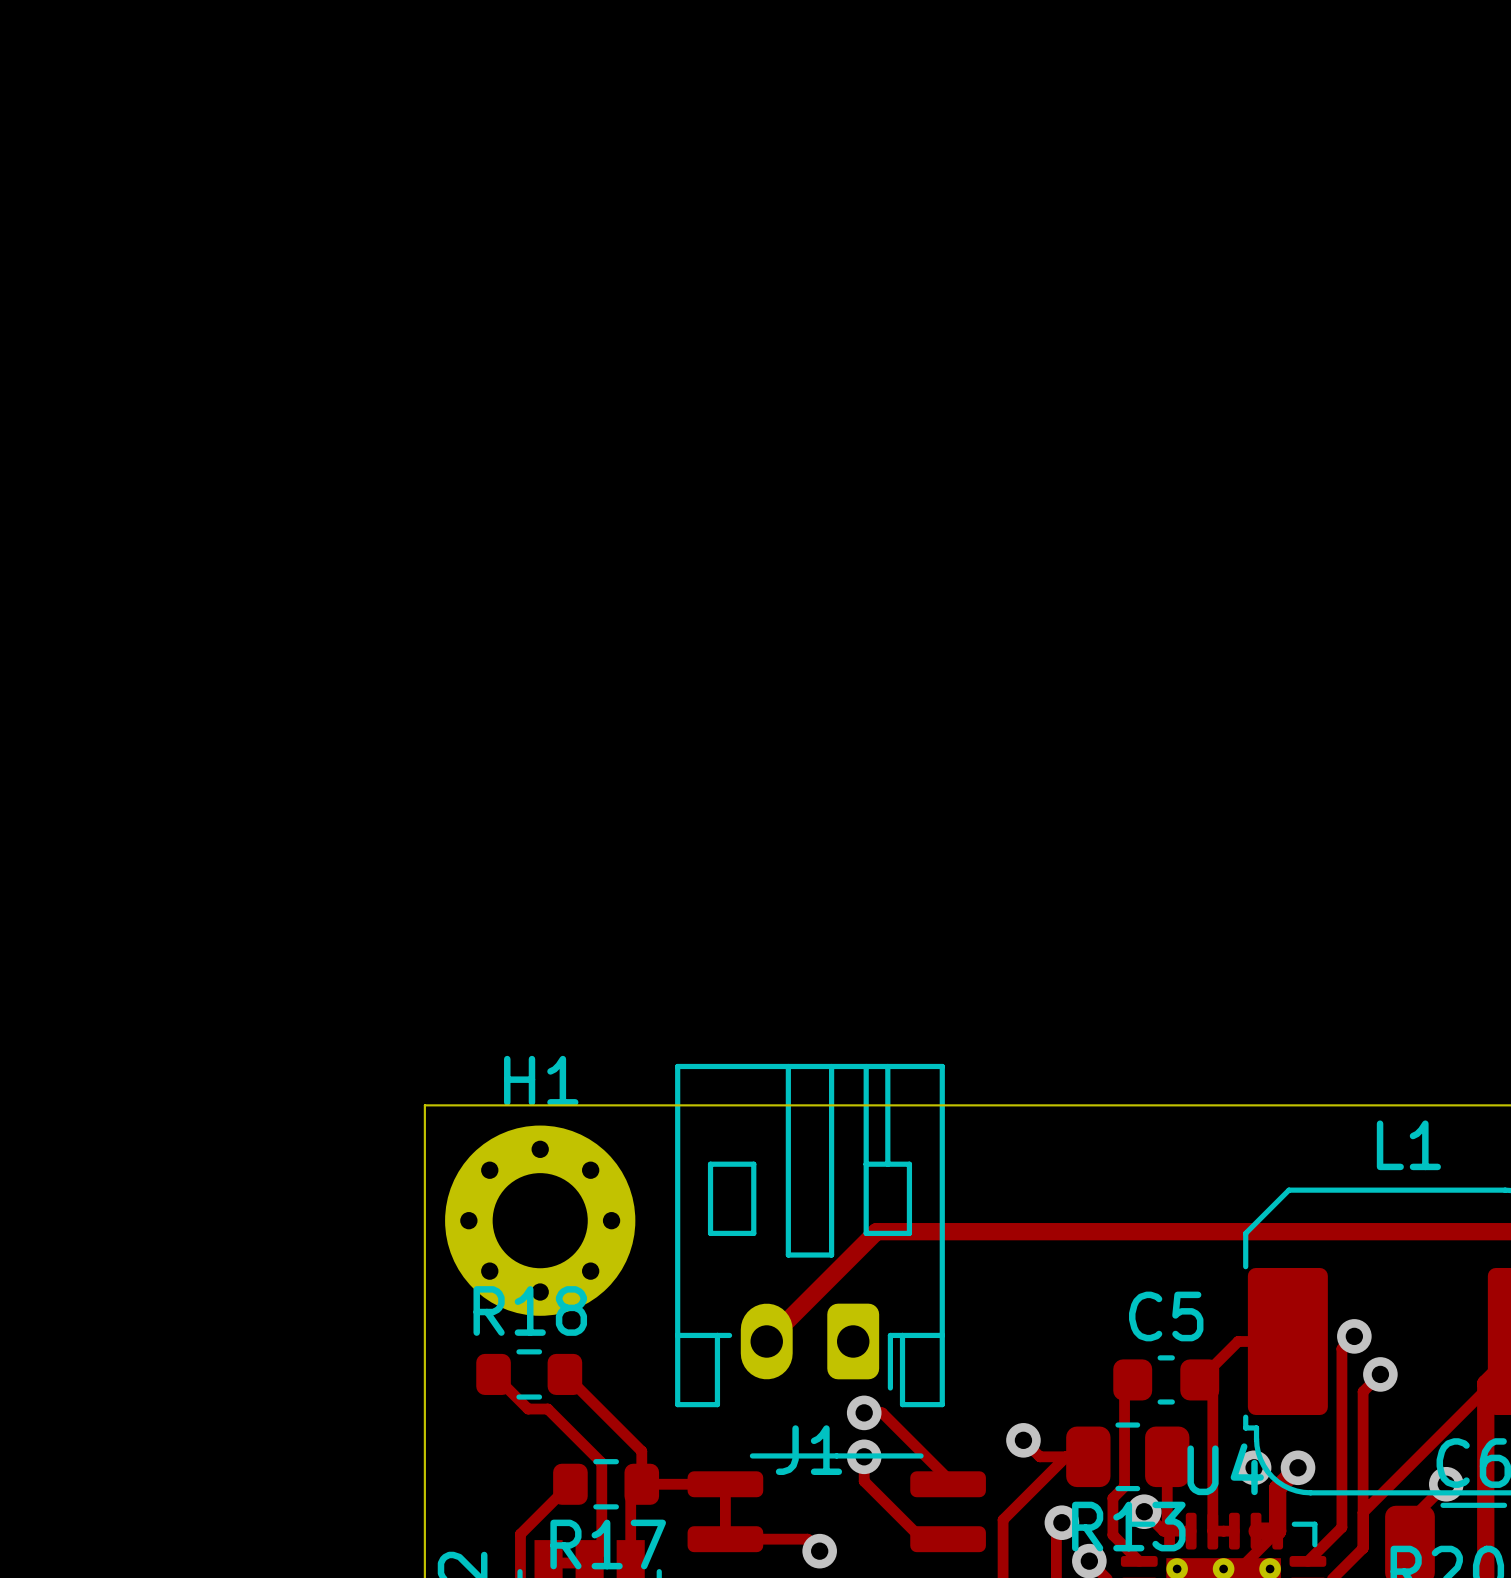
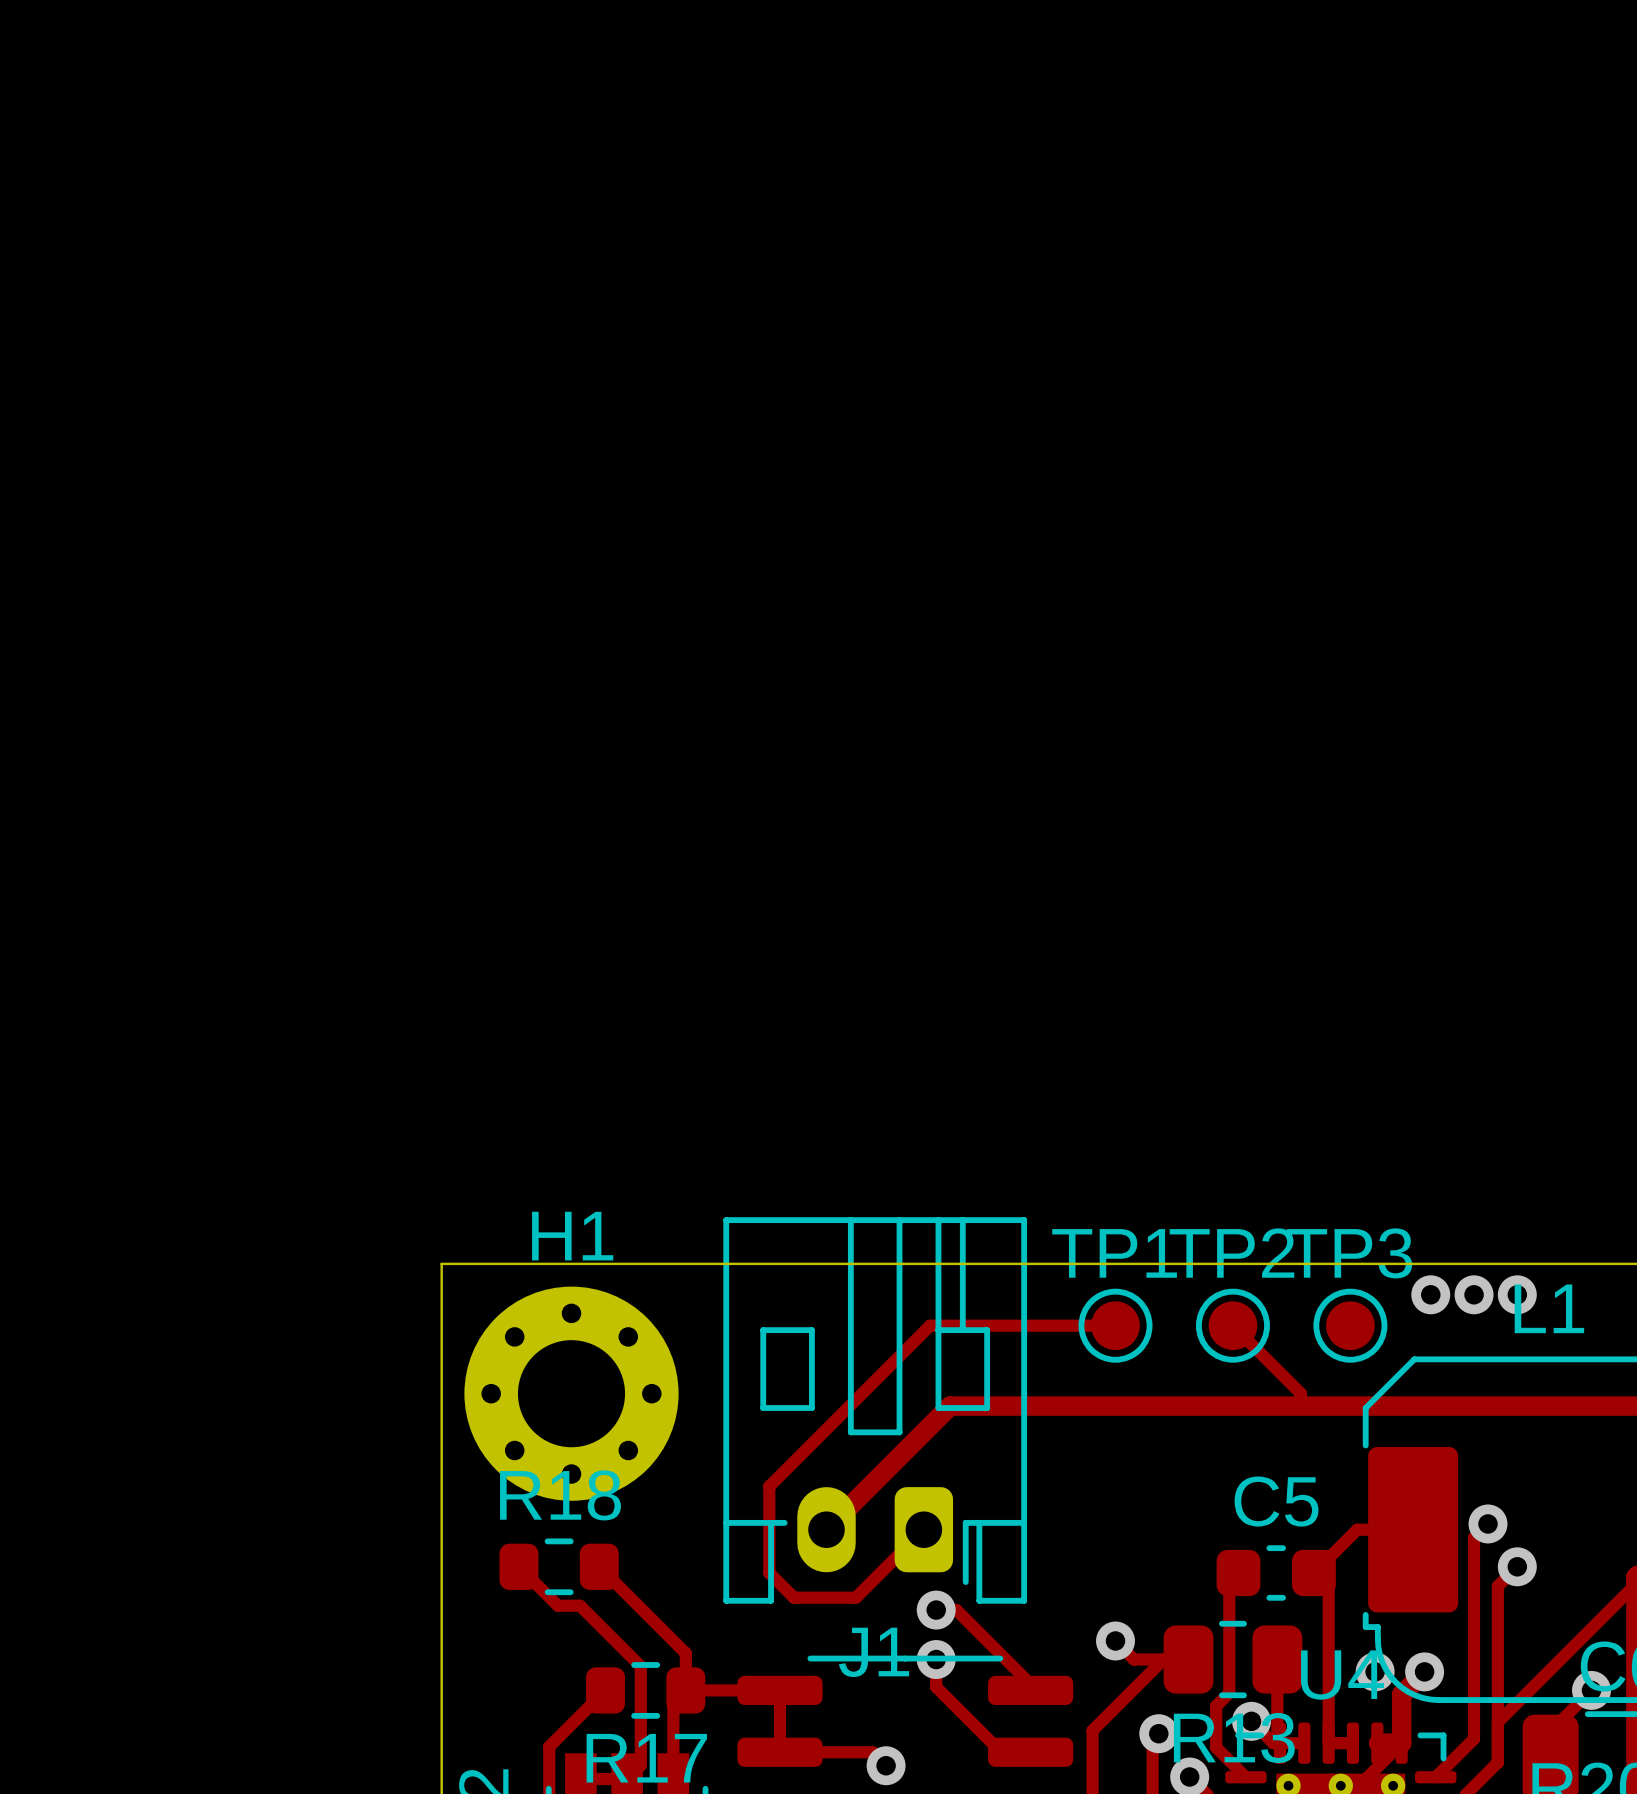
via: none -> (1430, 1294)
via: none -> (1474, 1294)
via: none -> (1517, 1294)
track: none -> (1115, 1325) (930, 1325) (769, 1486) (769, 1572) (794, 1597) (855, 1597) (923, 1529)
TP1: none -> (1115, 1325)
track: none -> (1232, 1325) (1300, 1393) (1300, 1399)
TP2: none -> (1232, 1325)
TP3: none -> (1350, 1325)

